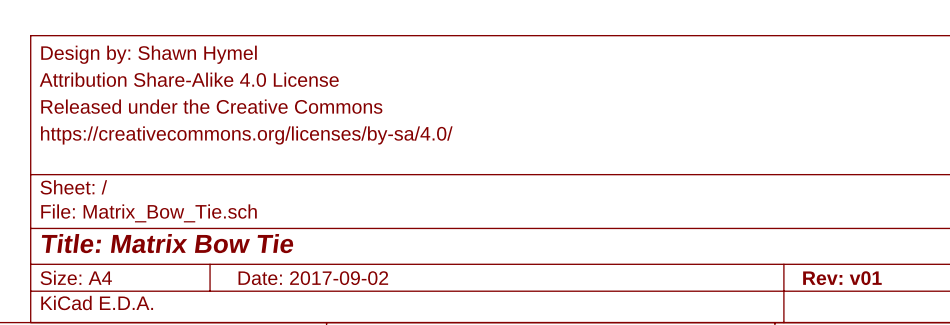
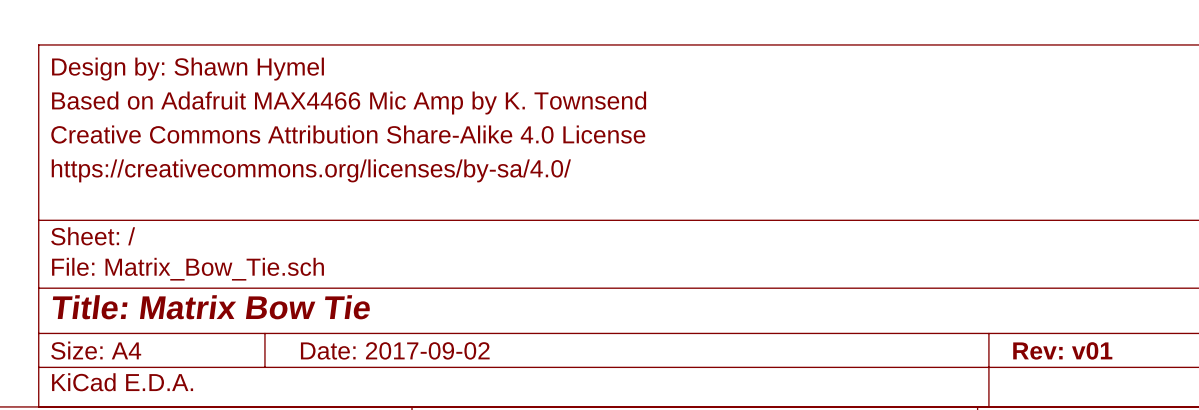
title block: Attribution Share-Alike 4.0 License (189, 79) -> Based on Adafruit MAX4466 Mic Amp by K. Townsend (349, 103)
title block: Released under the Creative Commons (211, 106) -> Creative Commons Attribution Share-Alike 4.0 License (348, 134)

